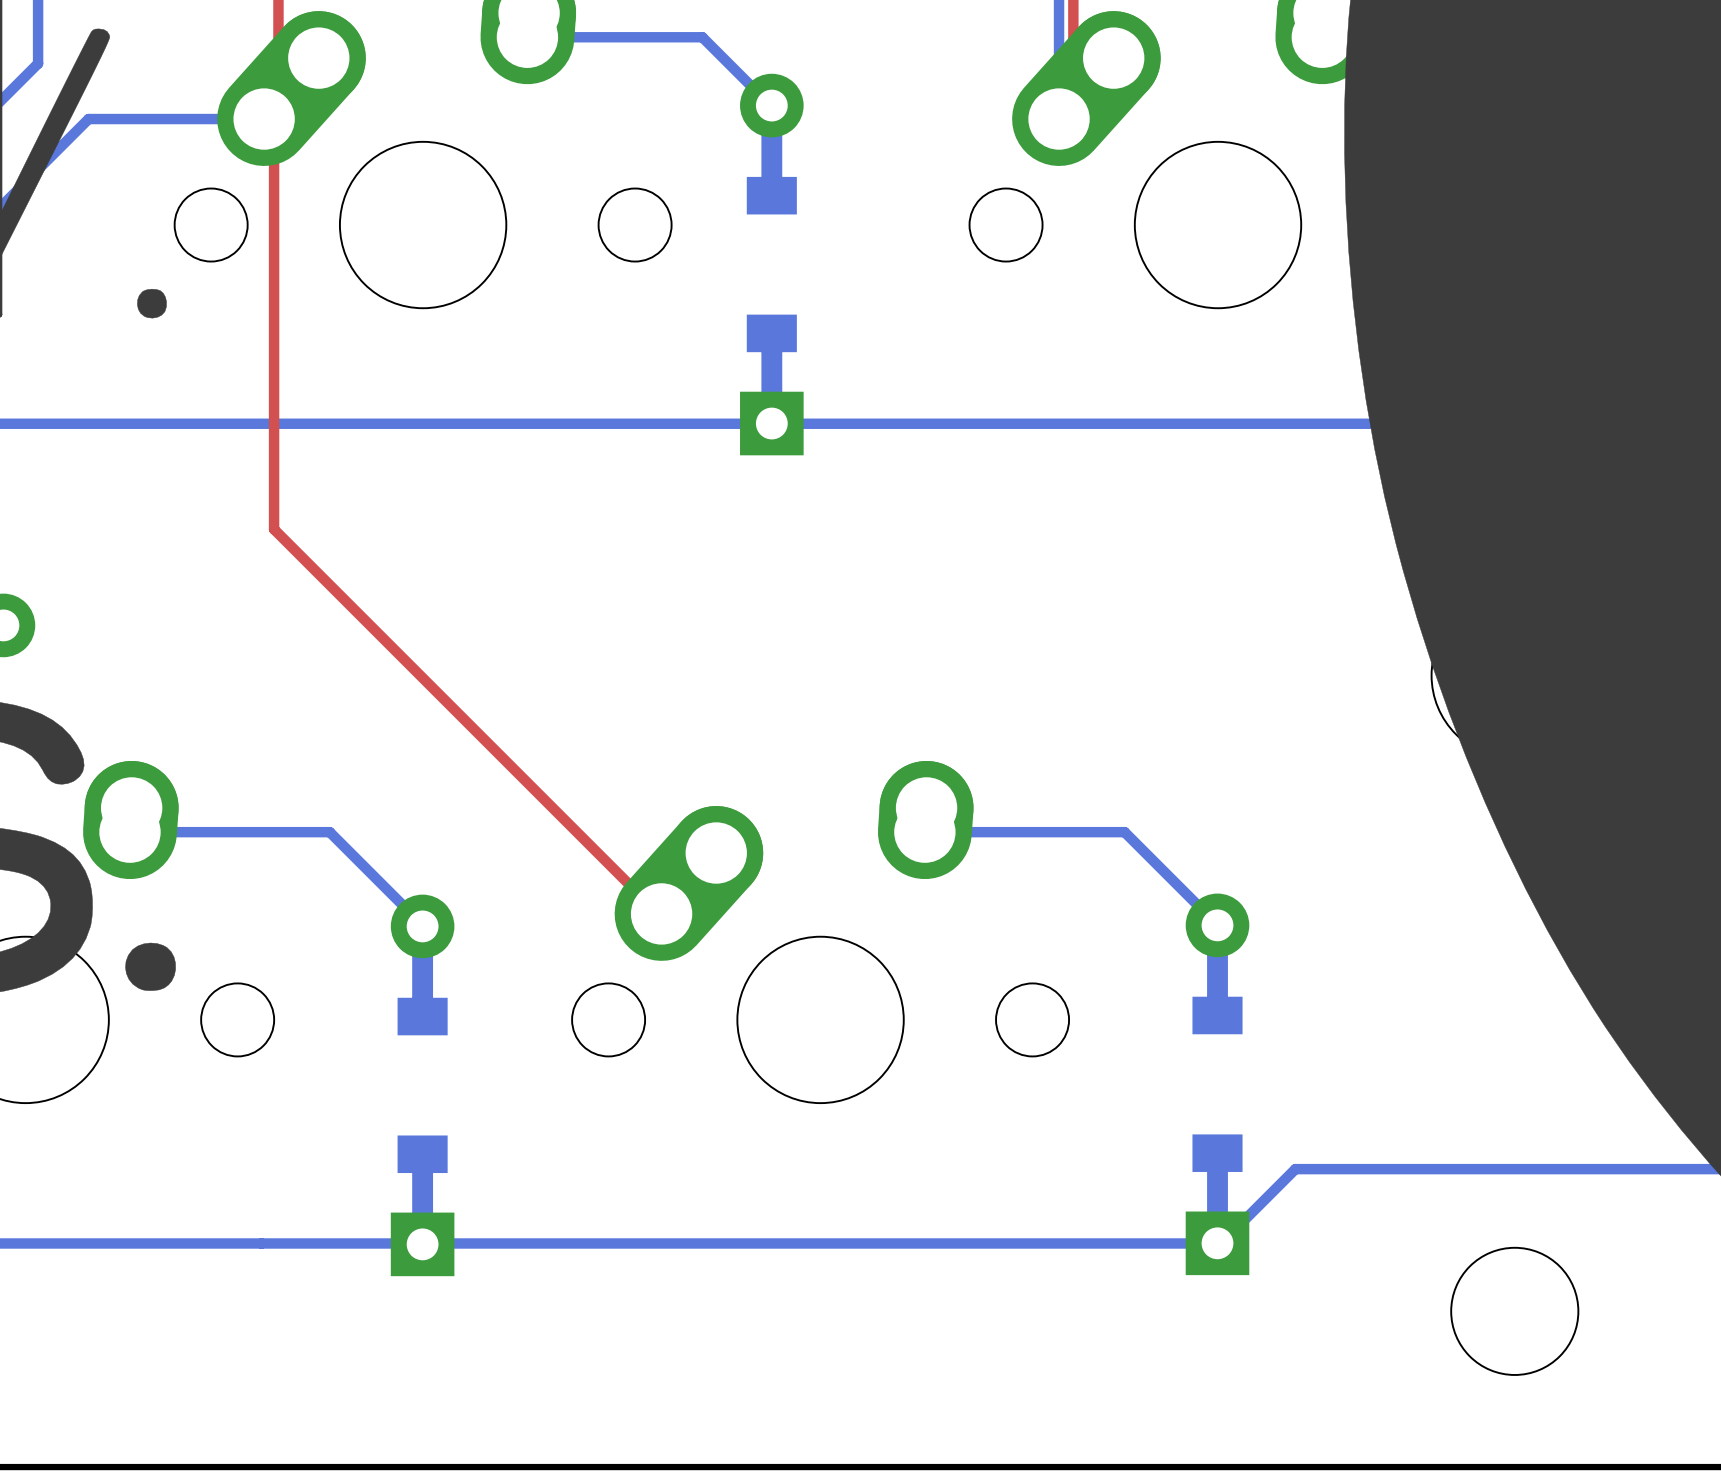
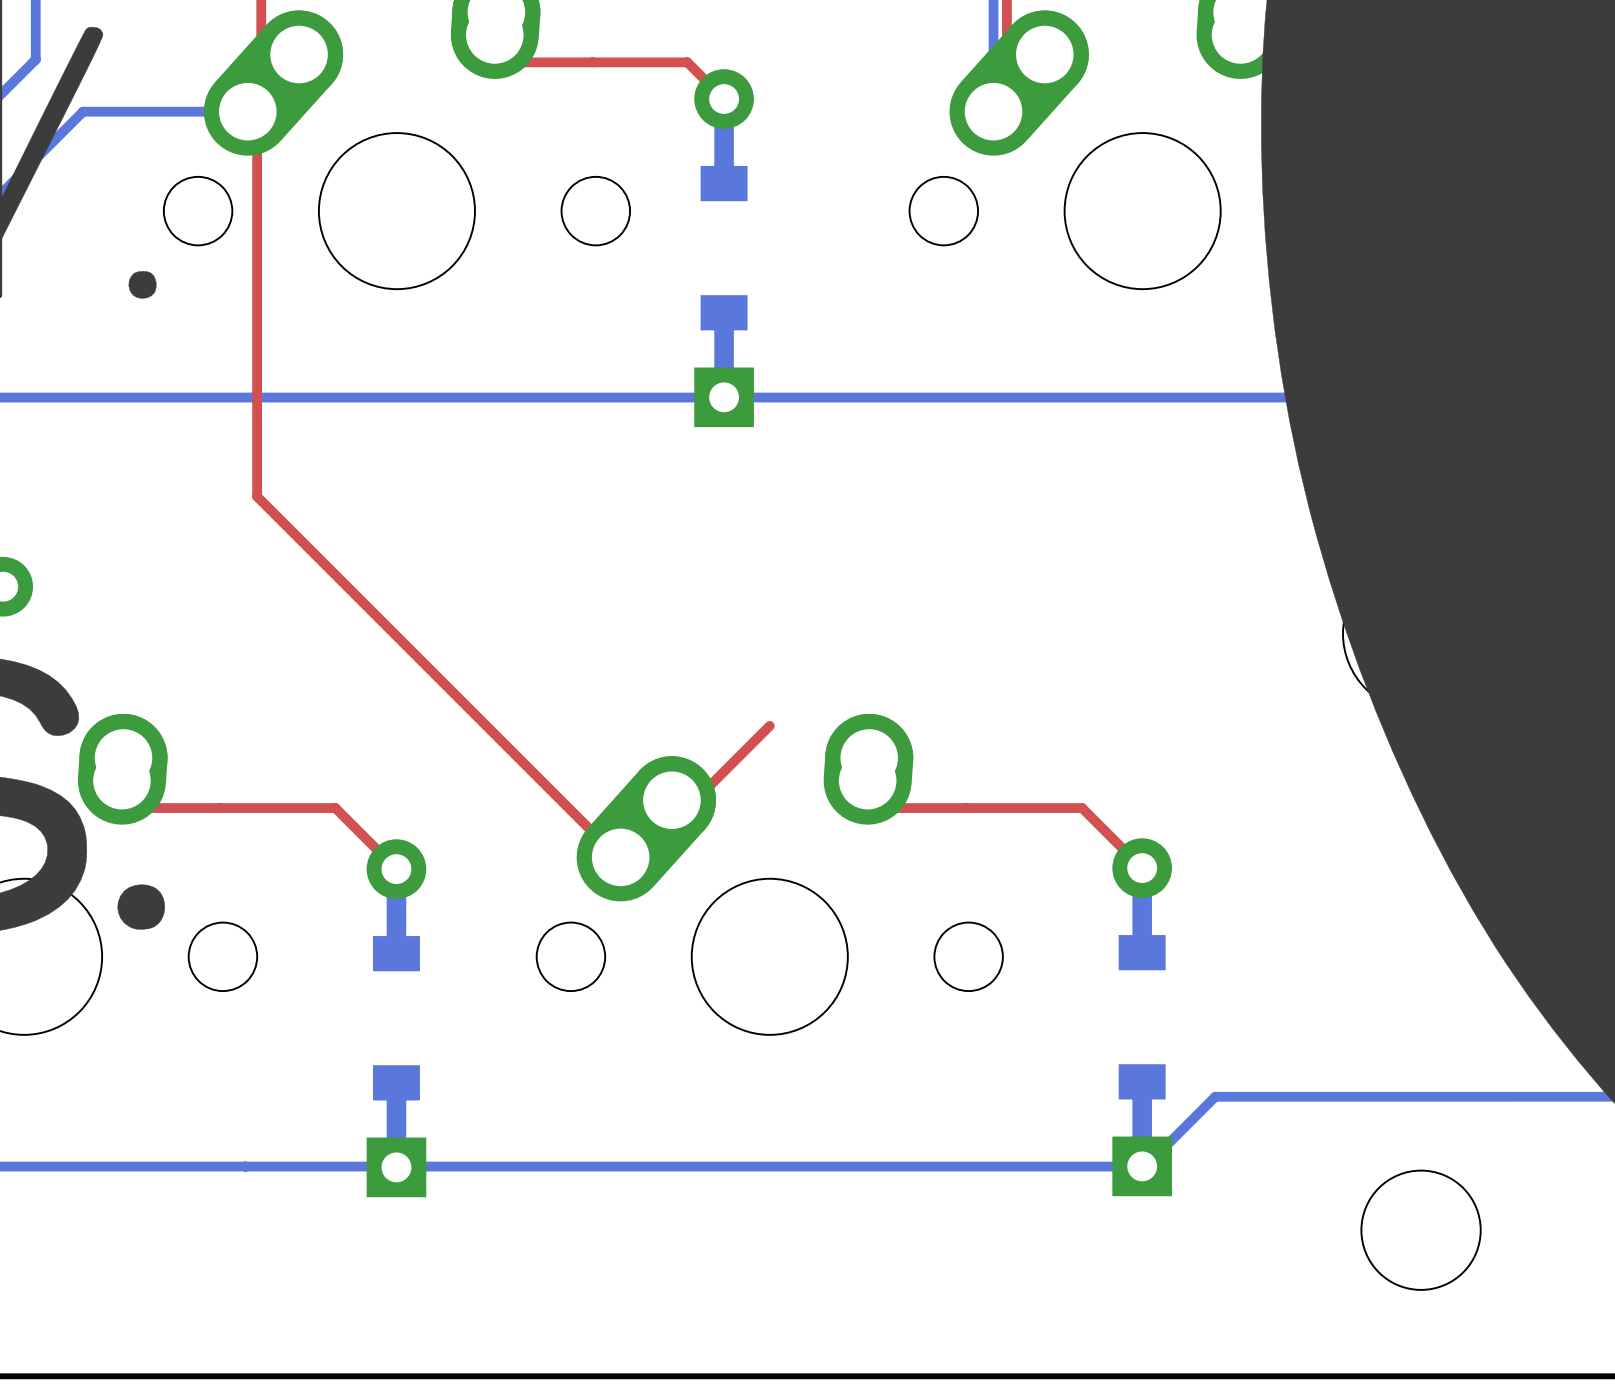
top track: none -> (494, 34) (522, 62) (687, 62) (724, 99)
bottom track: (533, 37) (702, 37) (770, 105) -> none
top track: none -> (769, 725) (695, 800) (671, 800)
bottom track: (129, 832) (329, 832) (423, 925) -> none
top track: none -> (121, 780) (149, 808) (335, 808) (396, 869)
top track: none -> (867, 780) (895, 808) (1082, 808) (1142, 868)
bottom track: (930, 832) (1124, 832) (1218, 925) -> none

